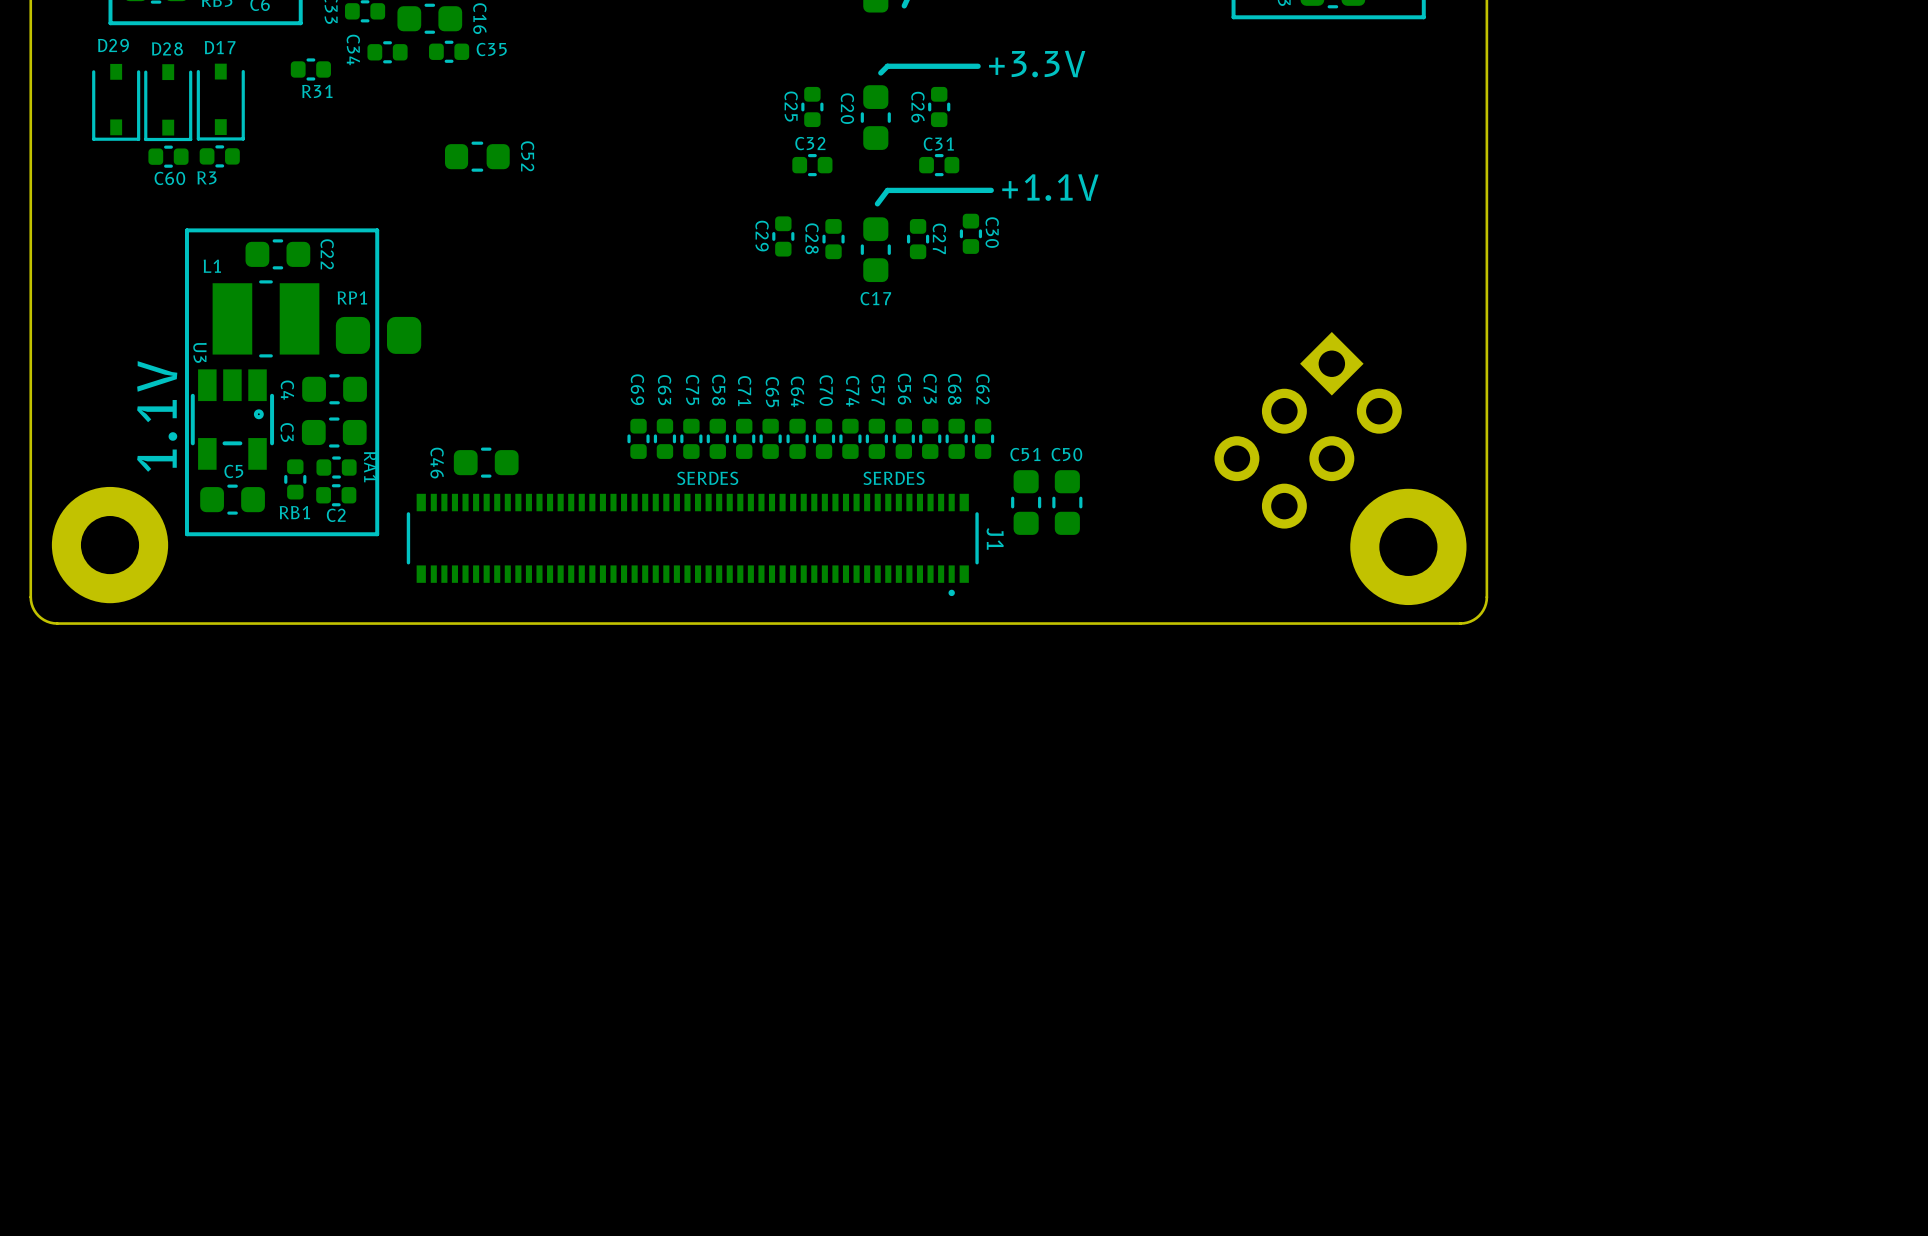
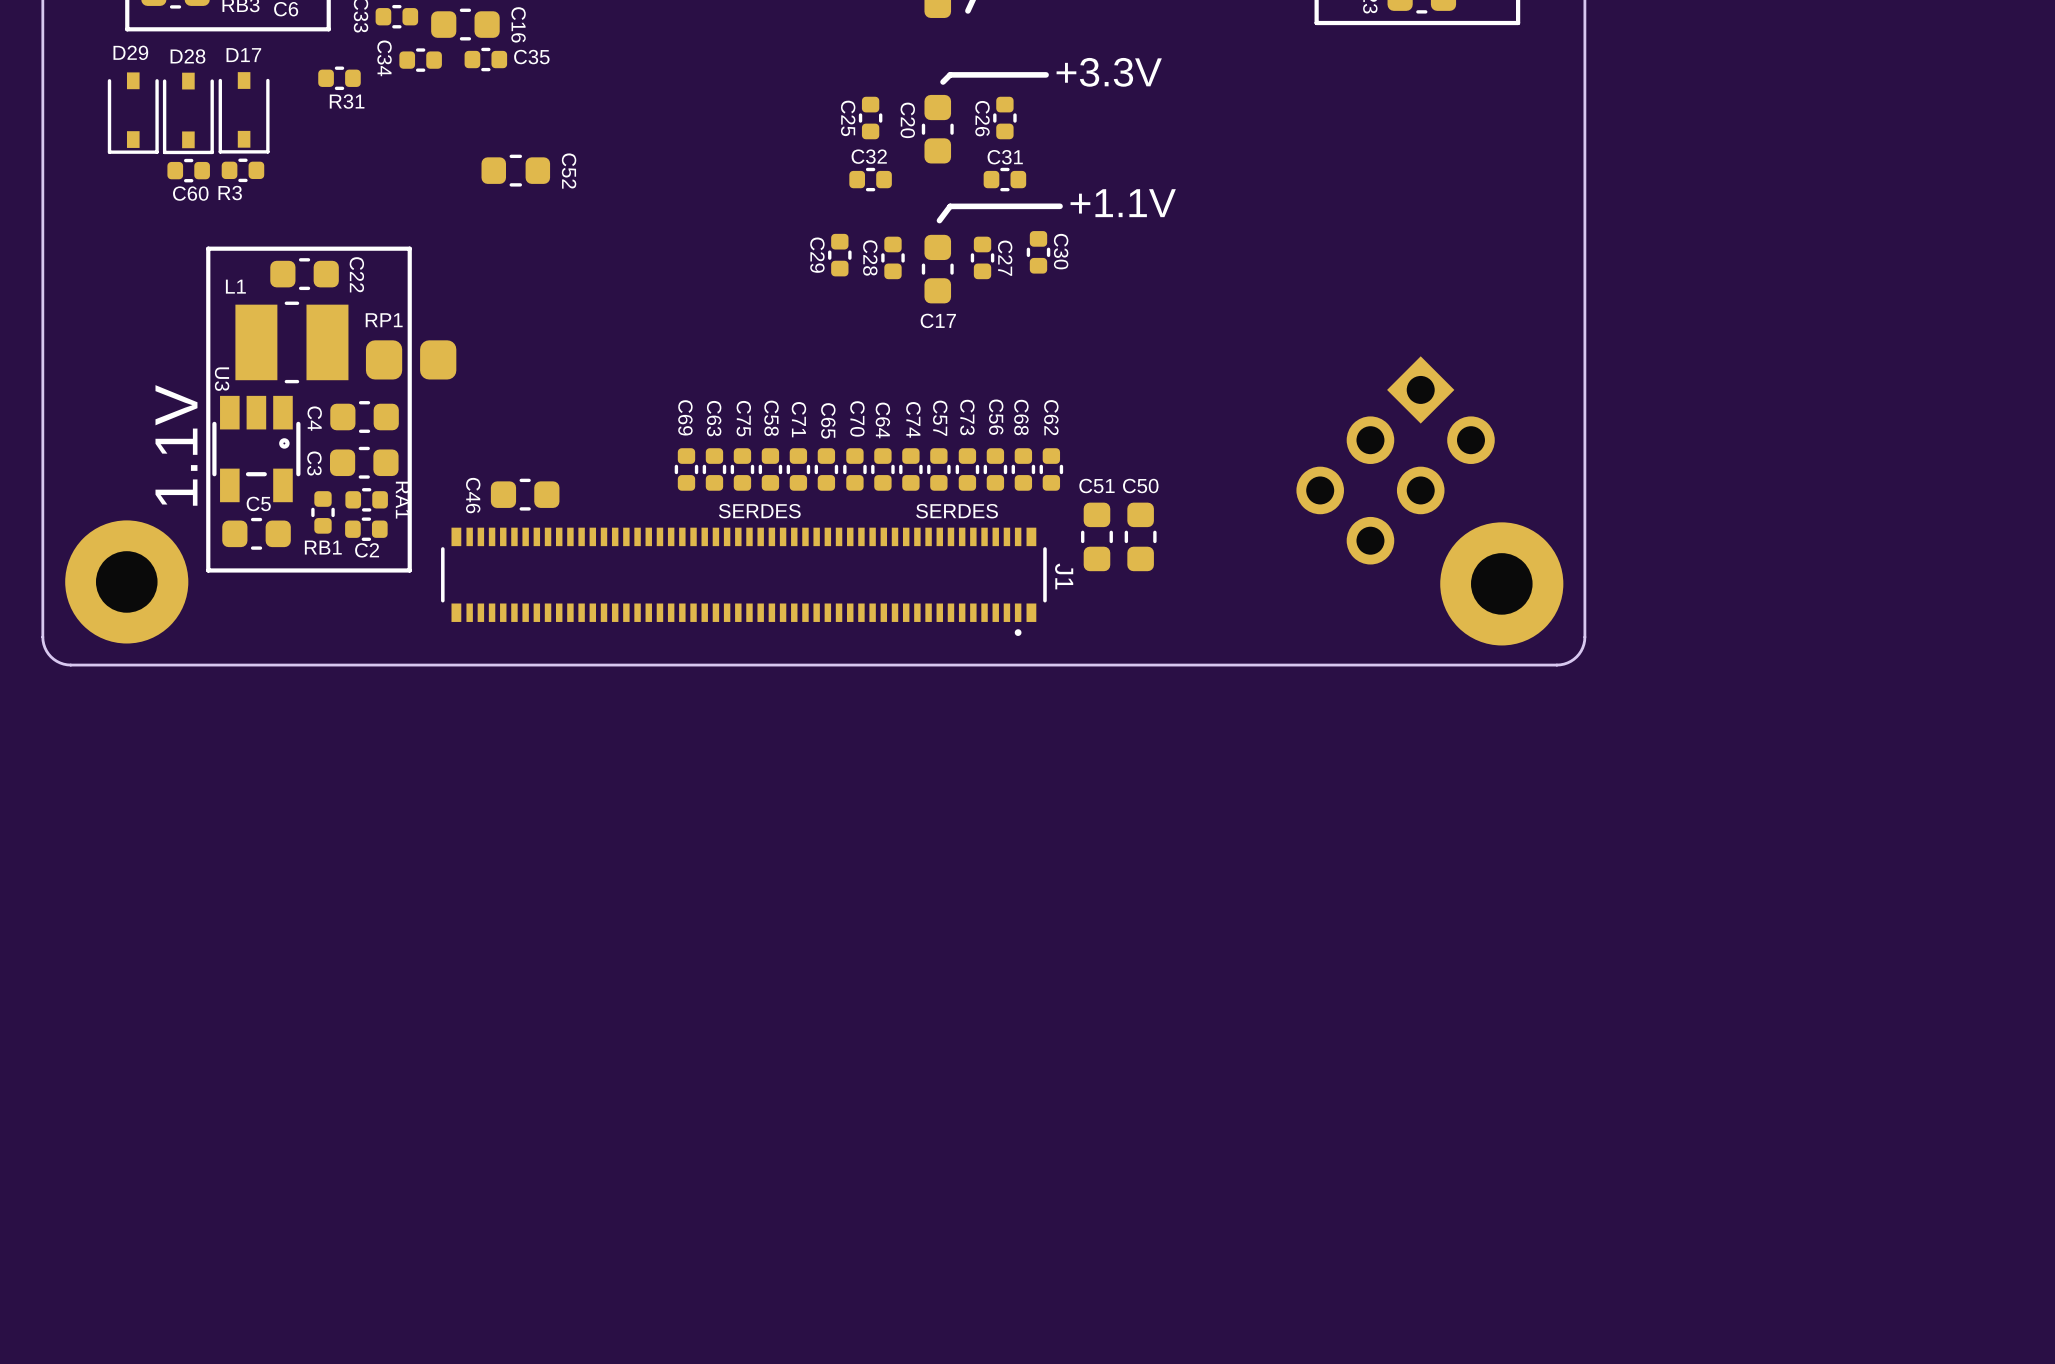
C56 name: C56 (904, 389) -> C73 (967, 417)
C73 name: C73 (930, 389) -> C56 (996, 417)
C70 name: C70 (826, 390) -> C64 (882, 420)
C64 name: C64 (797, 391) -> C70 (857, 418)

